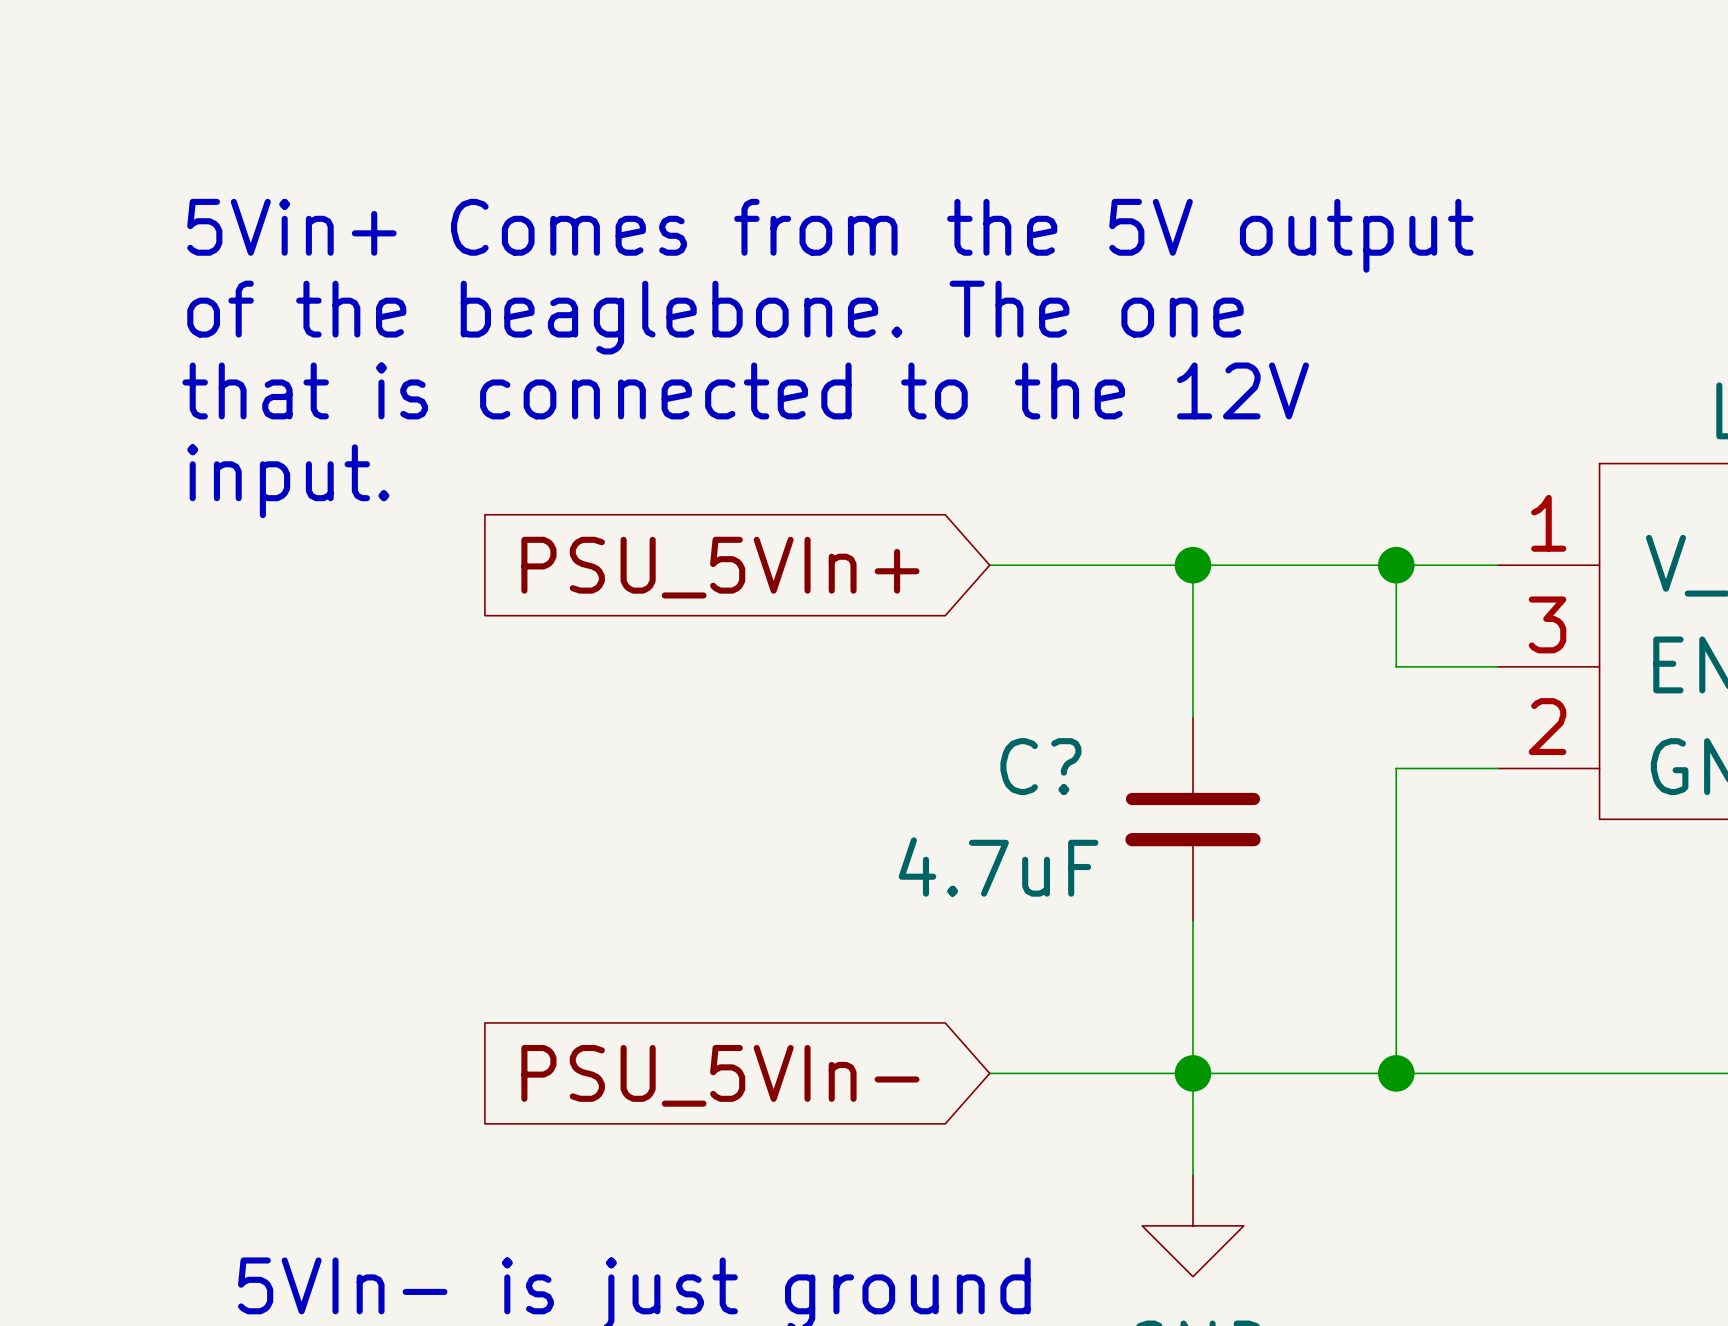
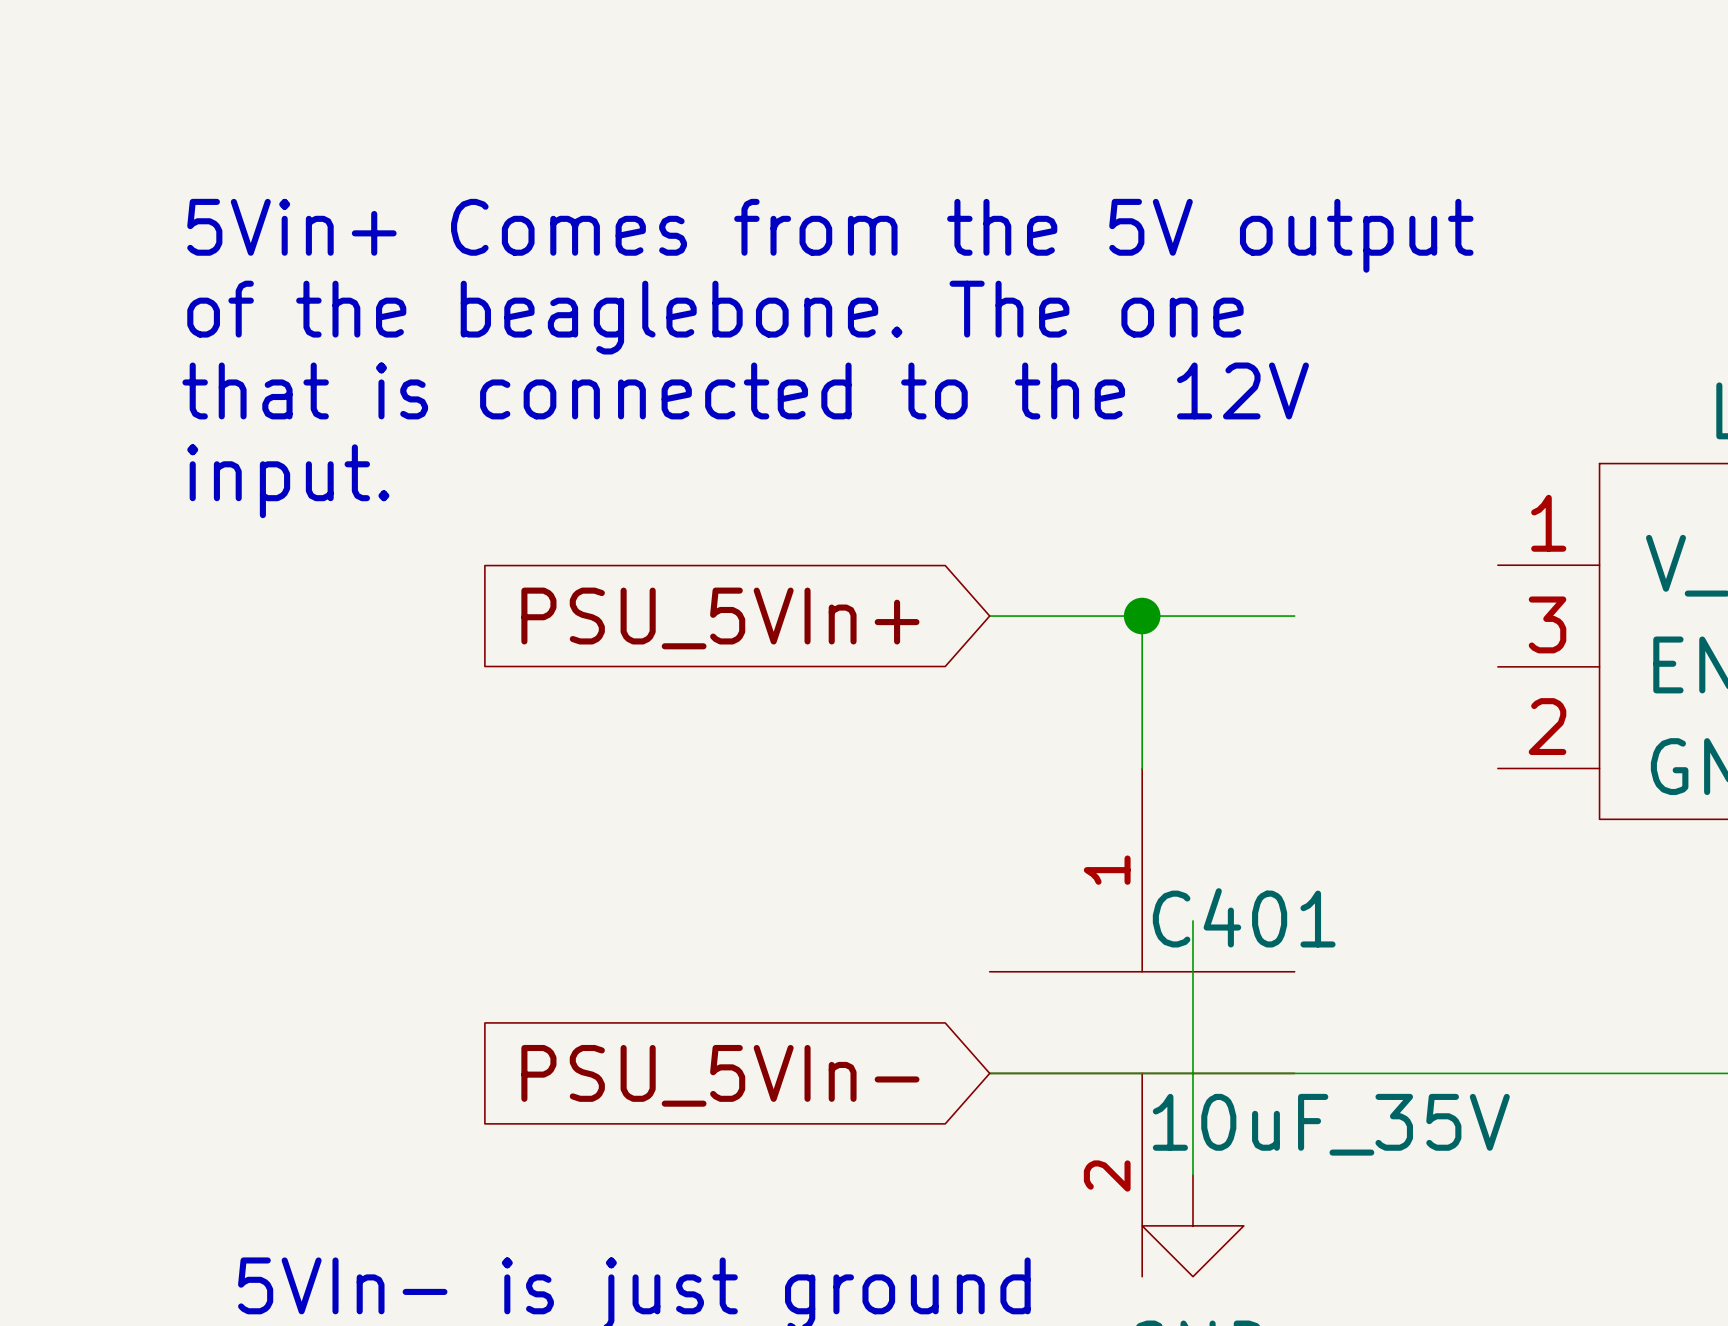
wire: (989, 565) (1497, 565) -> none
wire: (1192, 565) (1192, 717) -> (1142, 616) (1142, 768)
junction position: (1192, 565) -> (1142, 616)
wire: (1396, 565) (1396, 666) (1497, 666) -> none
junction: (1396, 565) -> none
global label position: PSU_5VIn+ (720, 567) -> PSU_5VIn+ (720, 618)
wire: none -> (989, 616) (1294, 616)
wire: (1497, 768) (1396, 768) (1396, 1073) -> none
C?: 4.7uF (1192, 819) -> none
C401: none -> 10uF_35V (1142, 1022)
junction: (1192, 1073) -> none
junction: (1396, 1073) -> none

